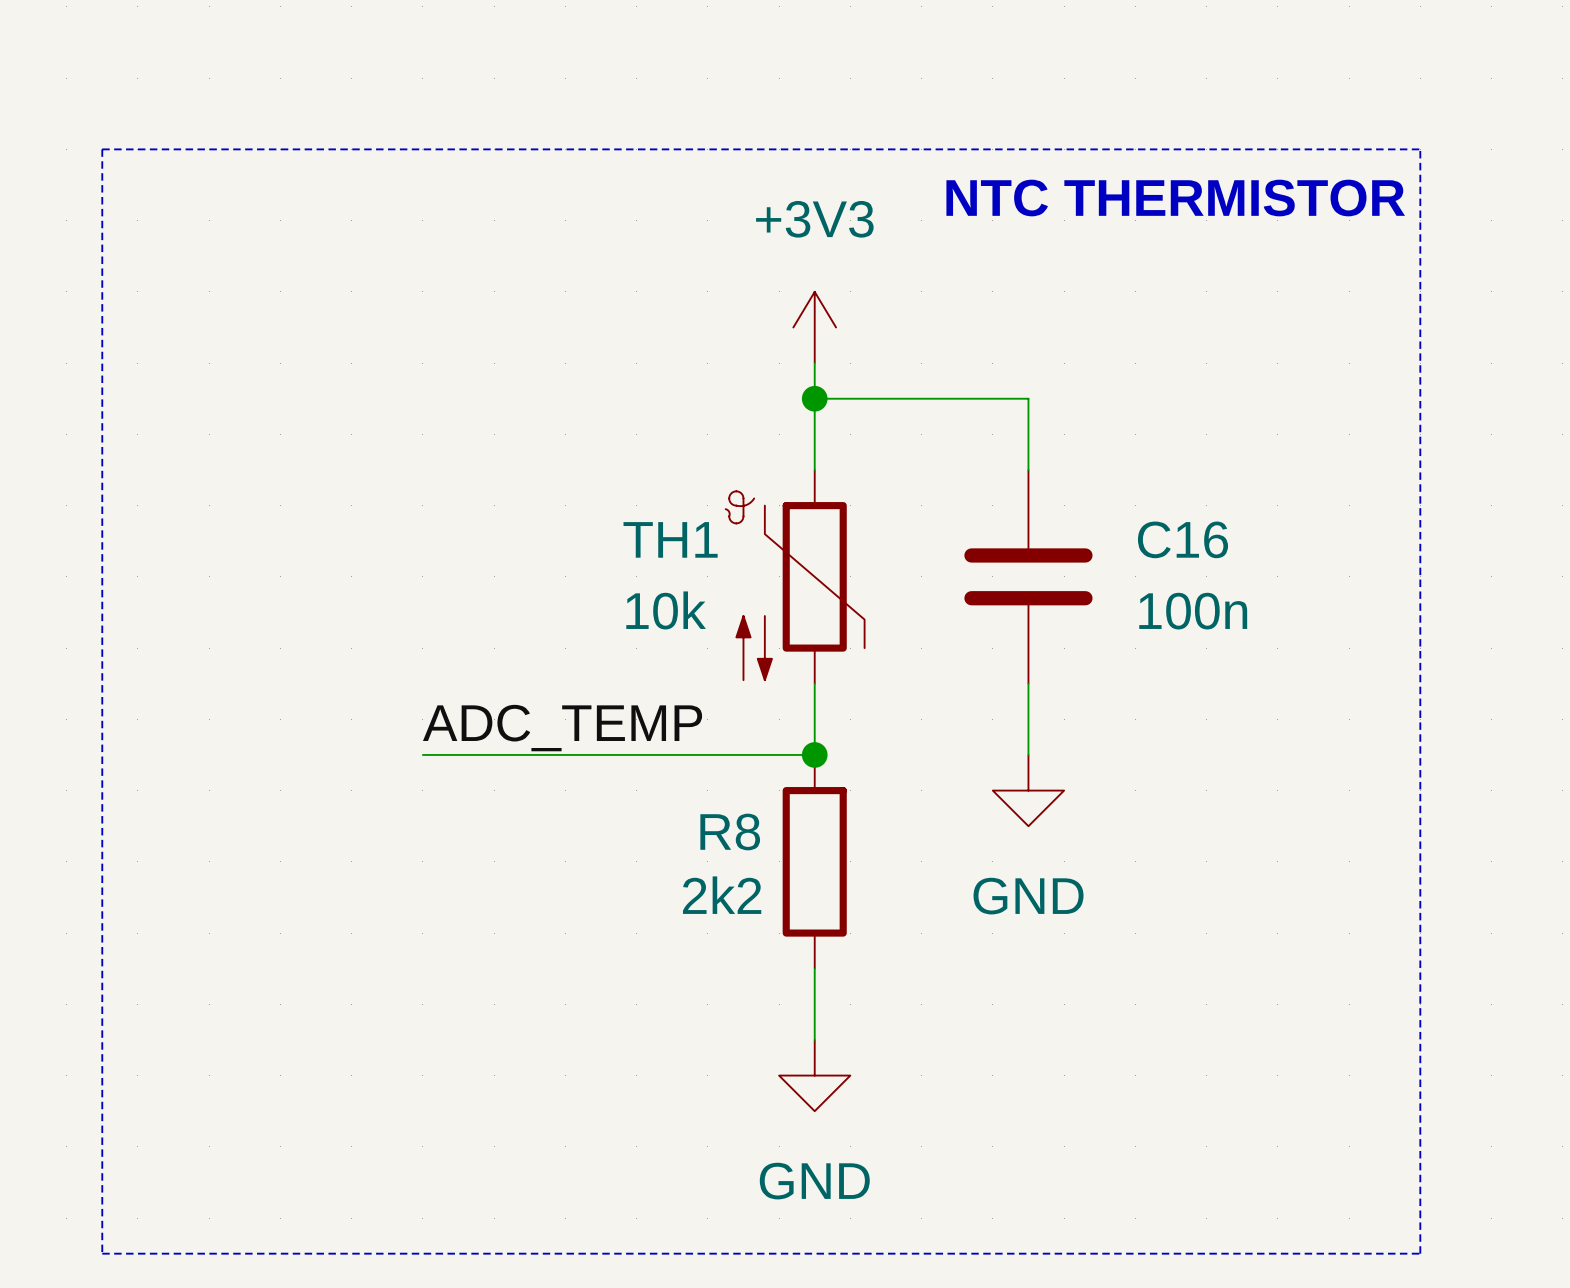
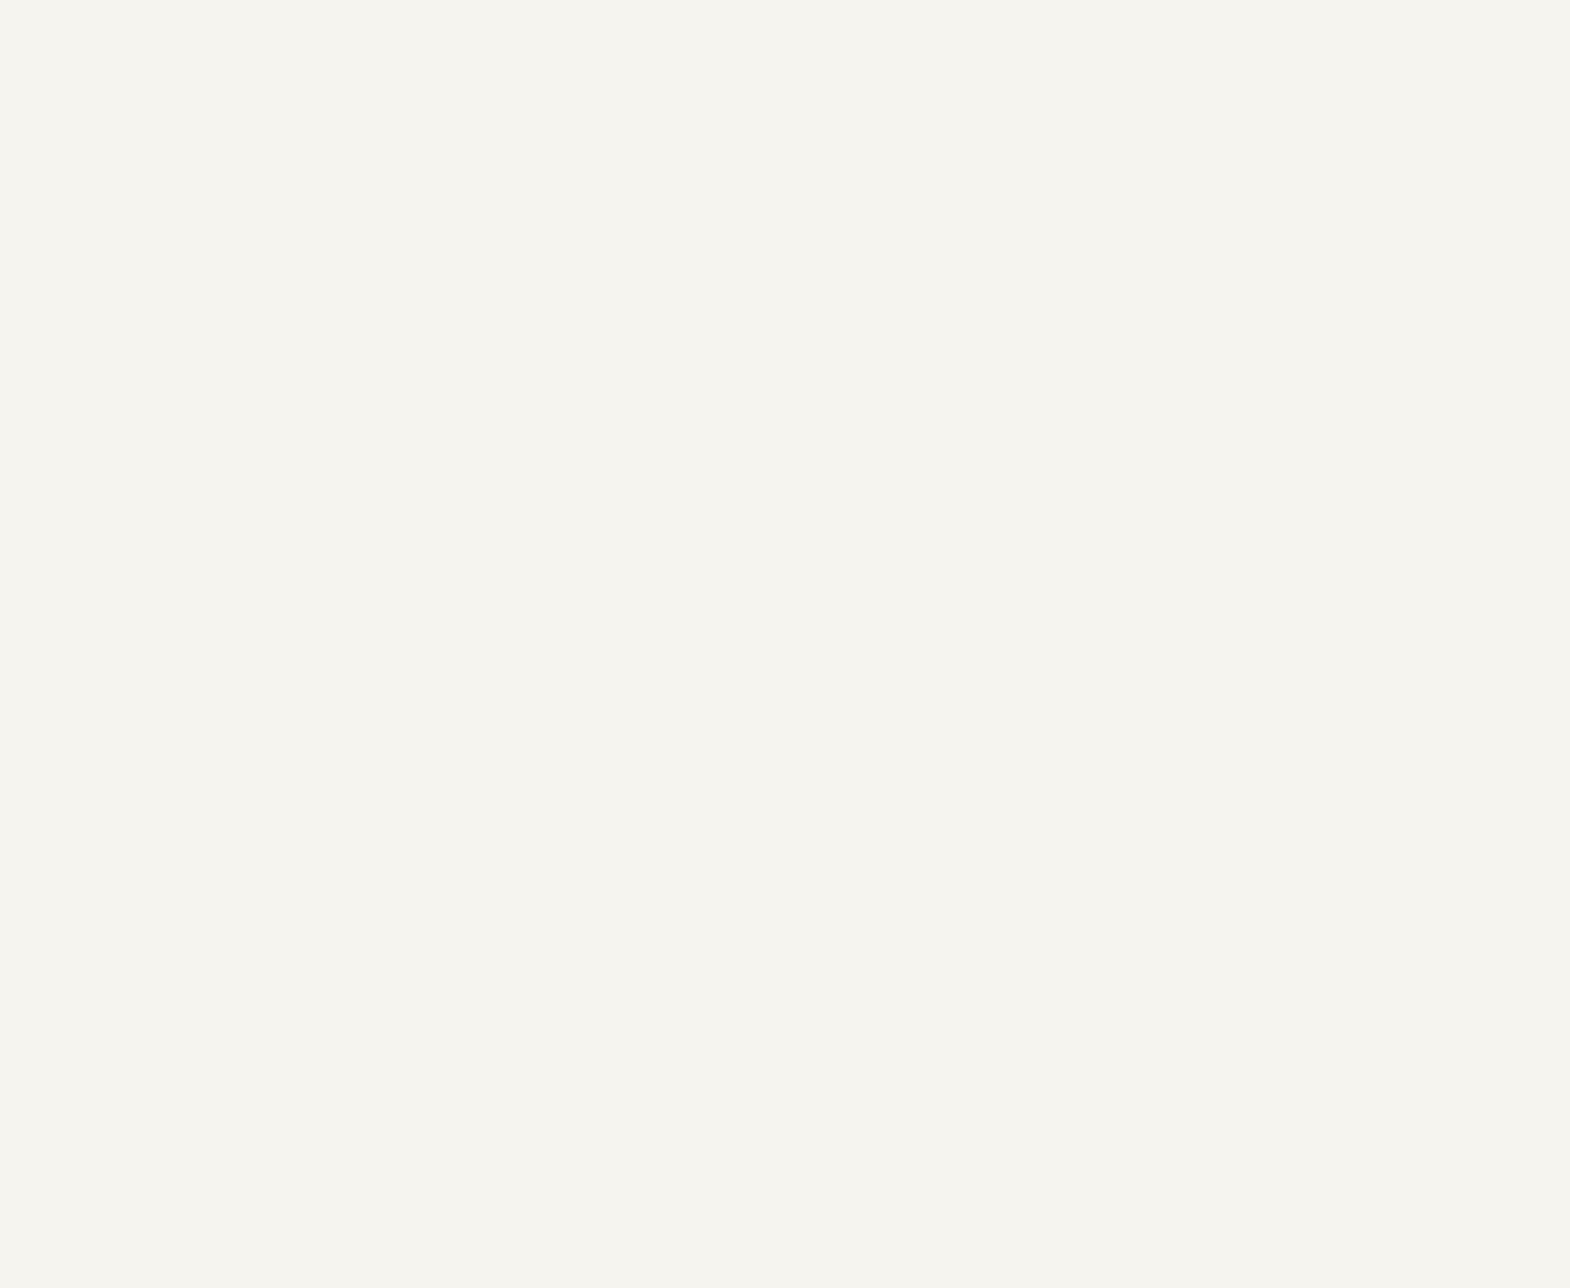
line: (102, 149) (102, 1253) (1420, 1253) (1420, 149) (102, 149) -> none
text: NTC THERMISTOR (1175, 198) -> none
power symbol: +3V3 (814, 327) -> none
wire: (814, 363) (814, 469) -> none
wire: (814, 398) (1028, 398) (1028, 469) -> none
junction: (814, 398) -> none
TH1: 10k (795, 576) -> none
C16: 100n (1028, 576) -> none
wire: (814, 683) (814, 754) (422, 754) -> none
wire: (1028, 683) (1028, 754) -> none
label: ADC_TEMP (562, 728) -> none
junction: (814, 754) -> none
power symbol: GND (1028, 790) -> none
R8: 2k2 (814, 861) -> none
wire: (814, 968) (814, 1039) -> none
power symbol: GND (814, 1075) -> none

